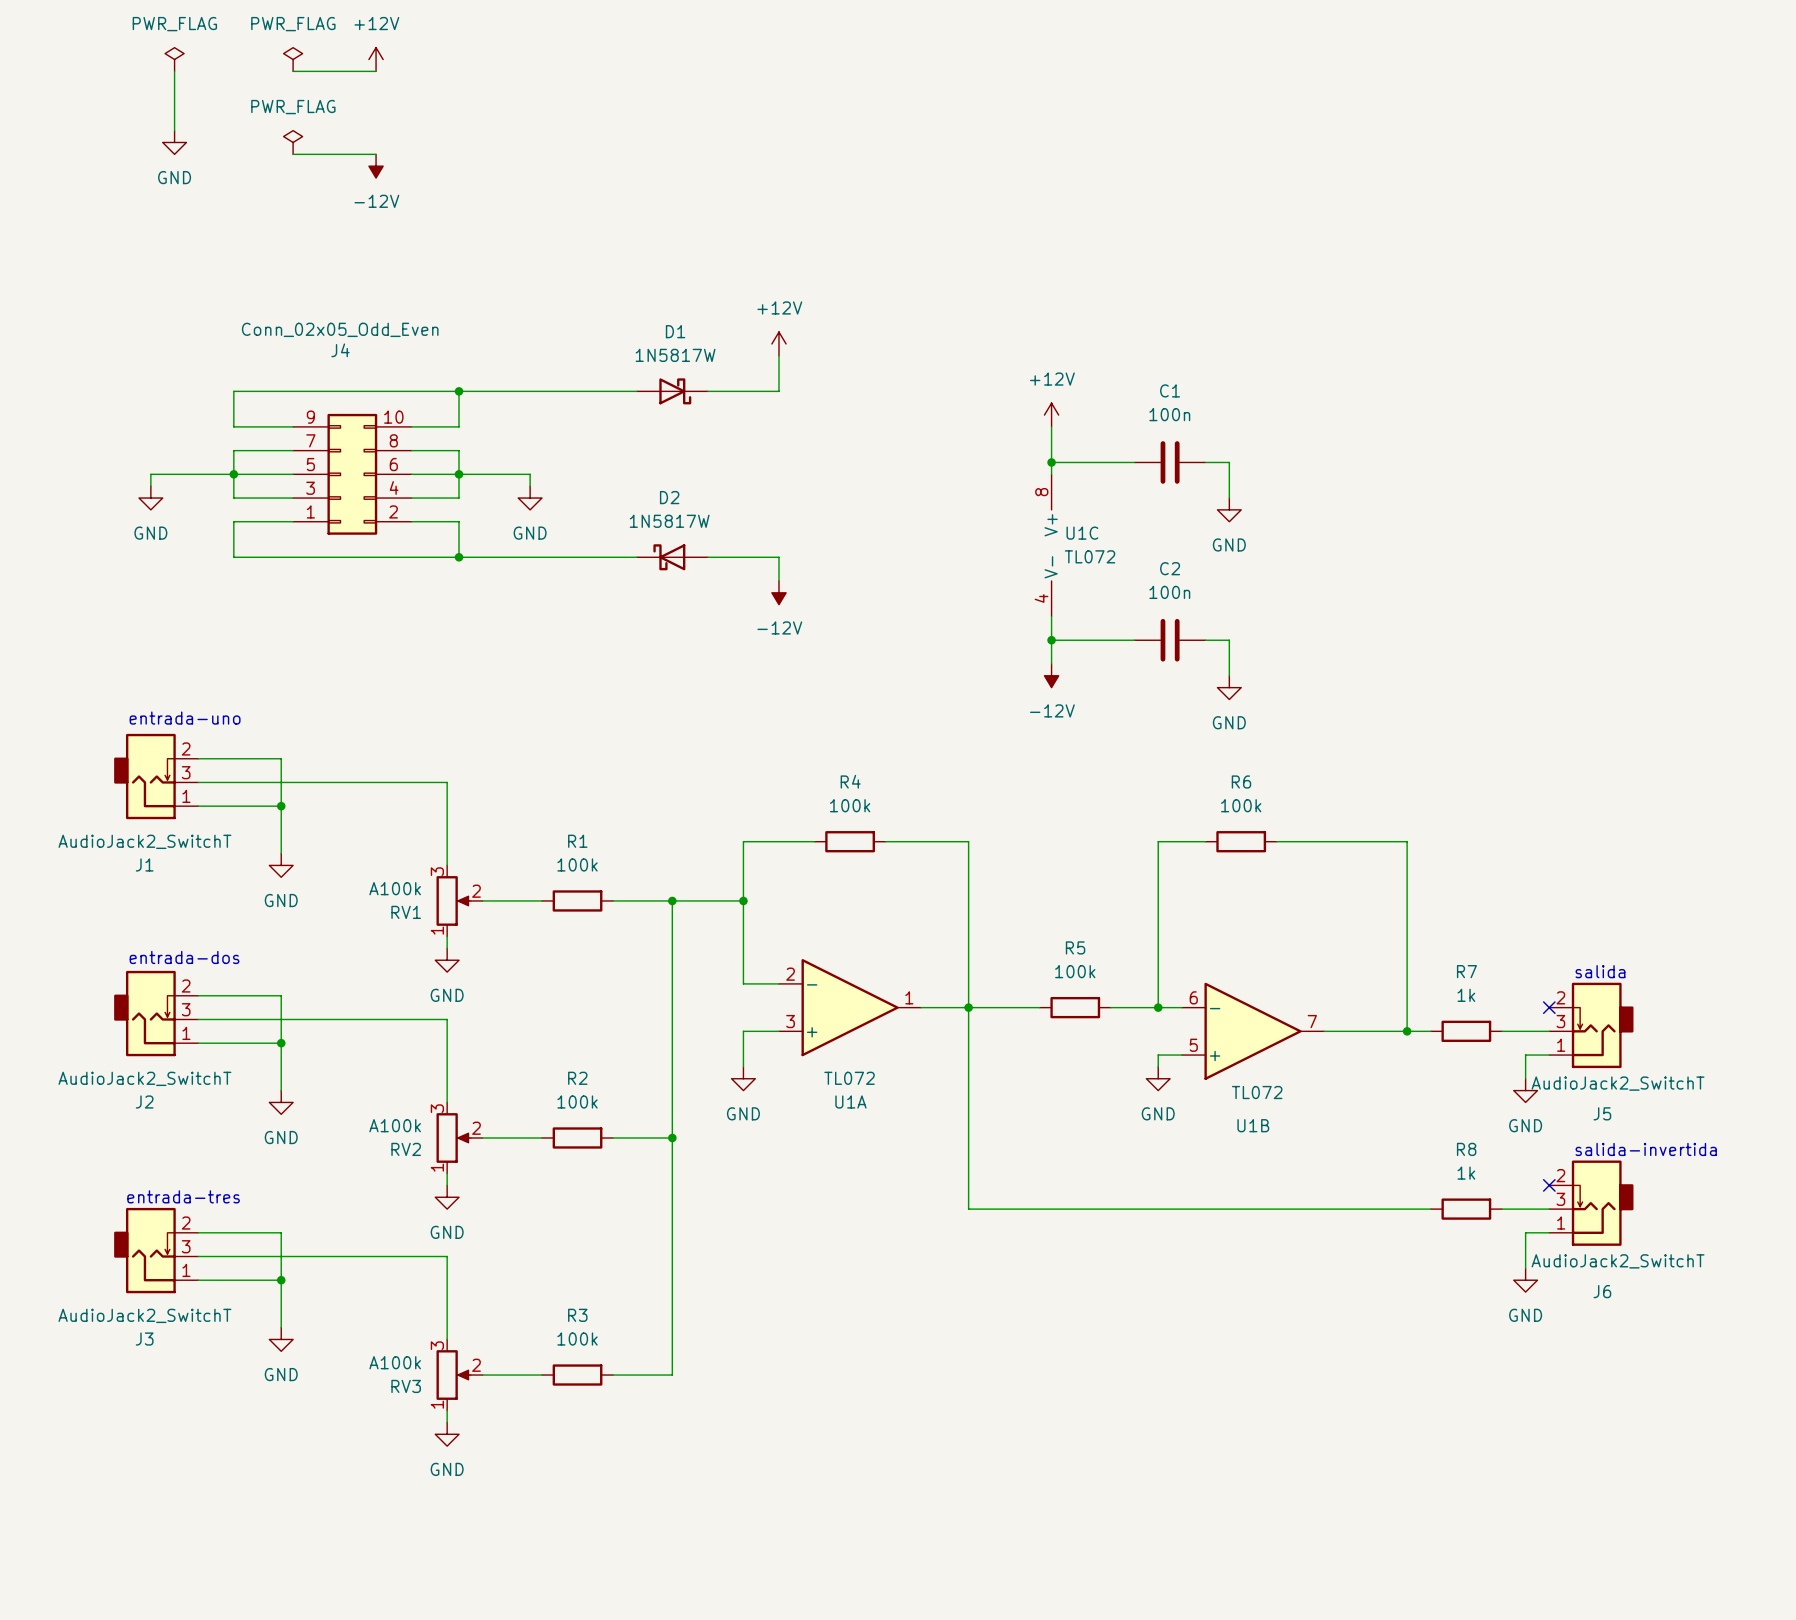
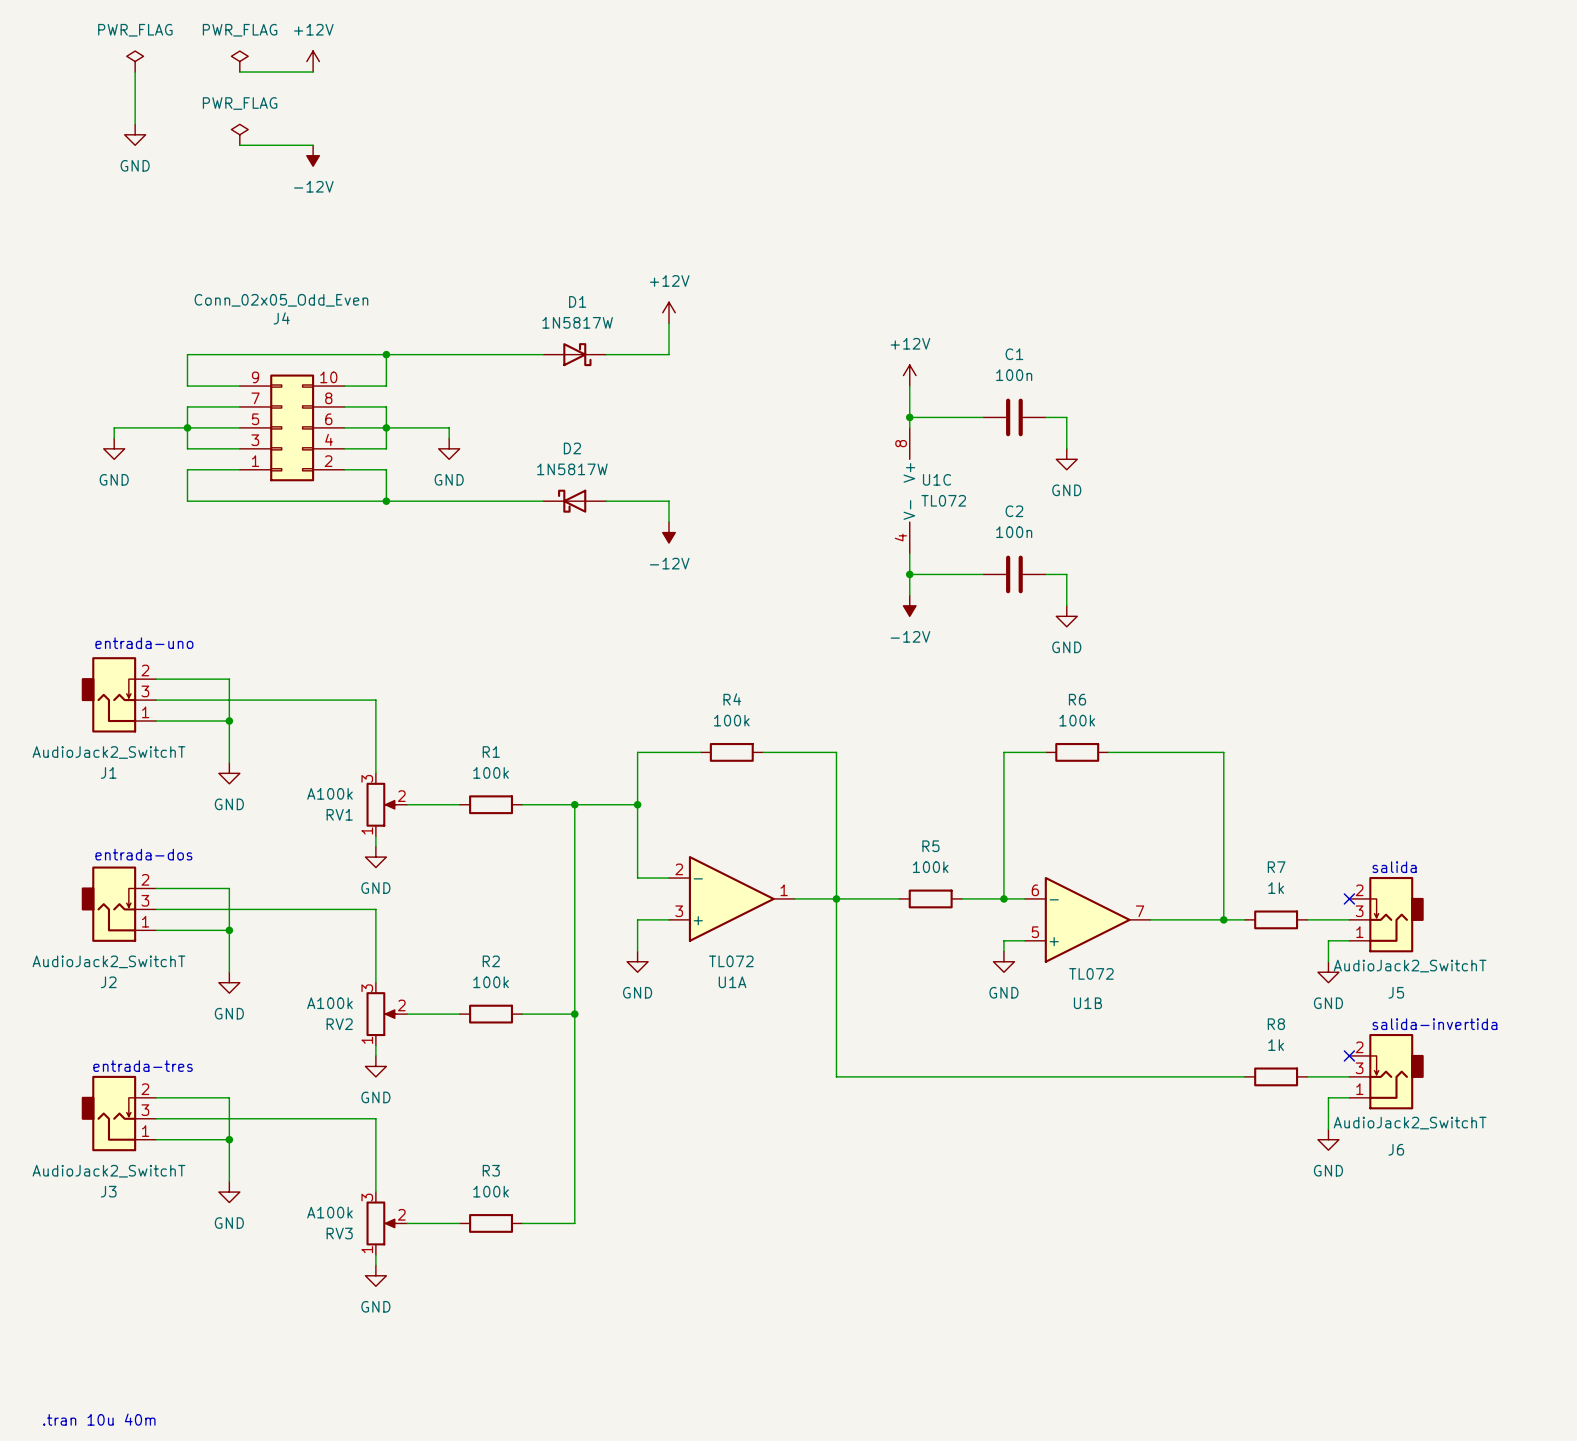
text: none -> .tran 10u 40m (99, 1419)

